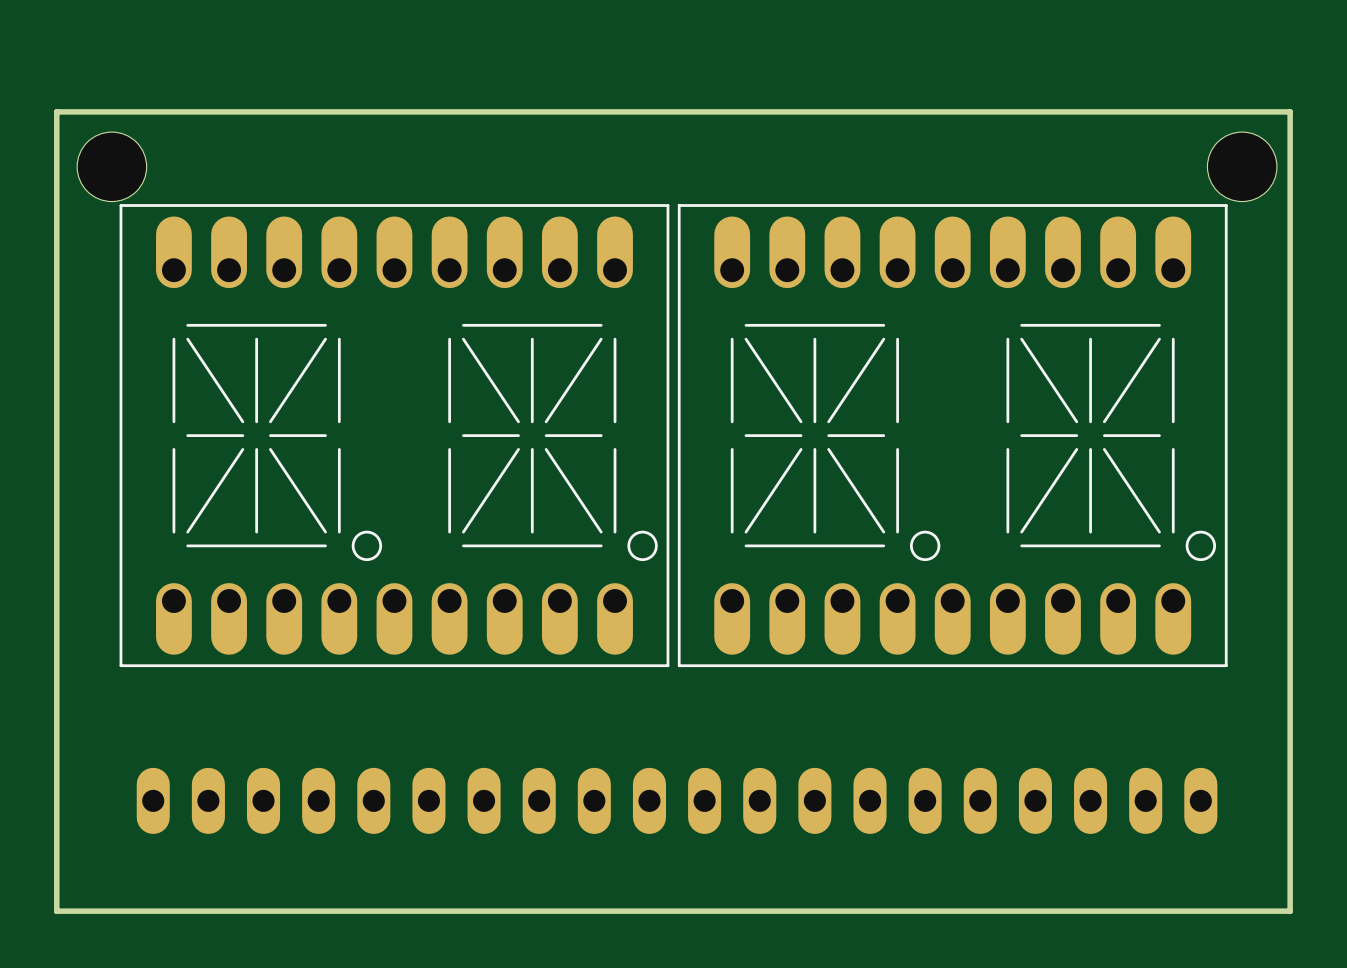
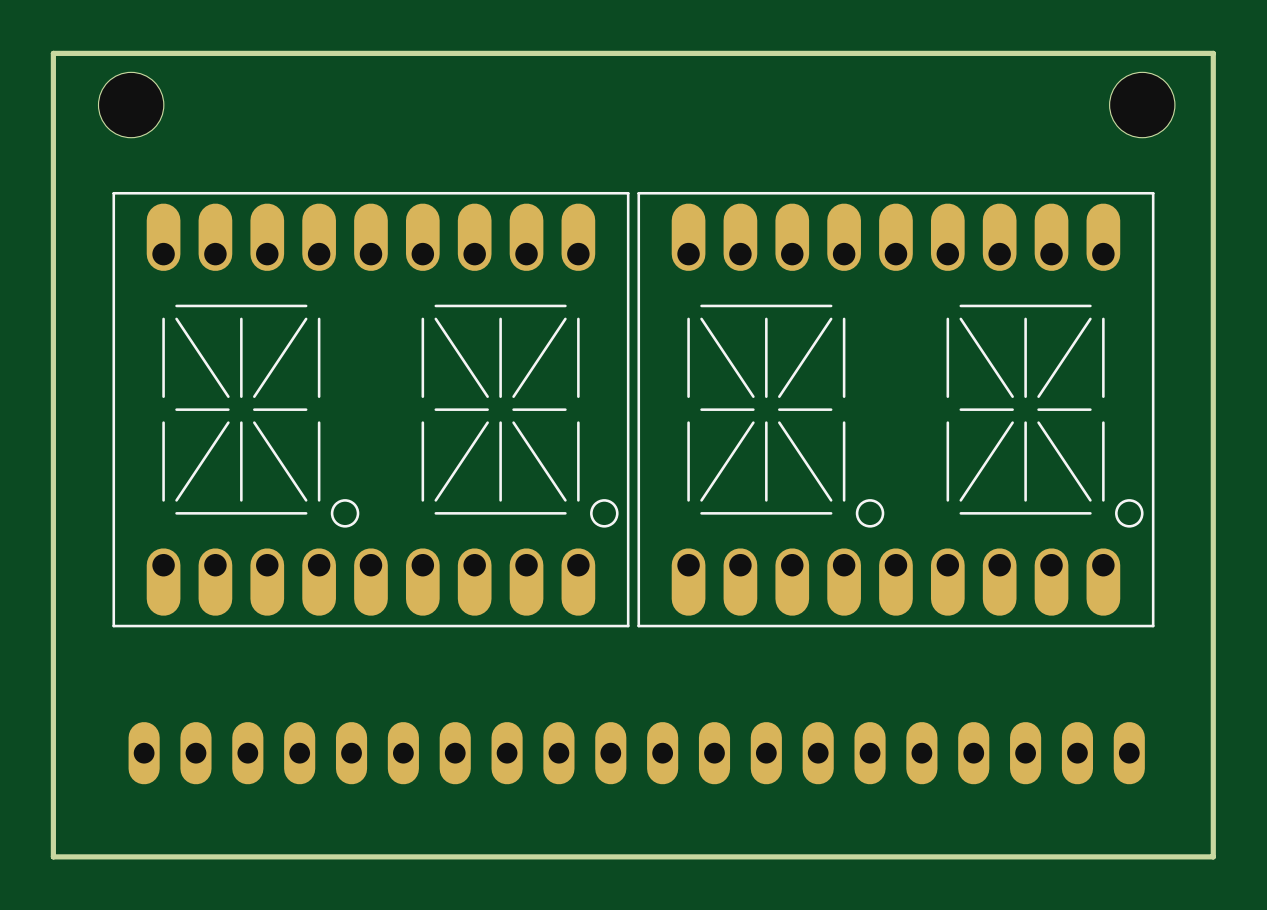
board edge: (56, 111) (1290, 111) -> (53, 105) (53, 53) (1213, 53) (1213, 105)
hole position: (111, 166) -> (131, 105)
hole position: (1242, 166) -> (1142, 105)

